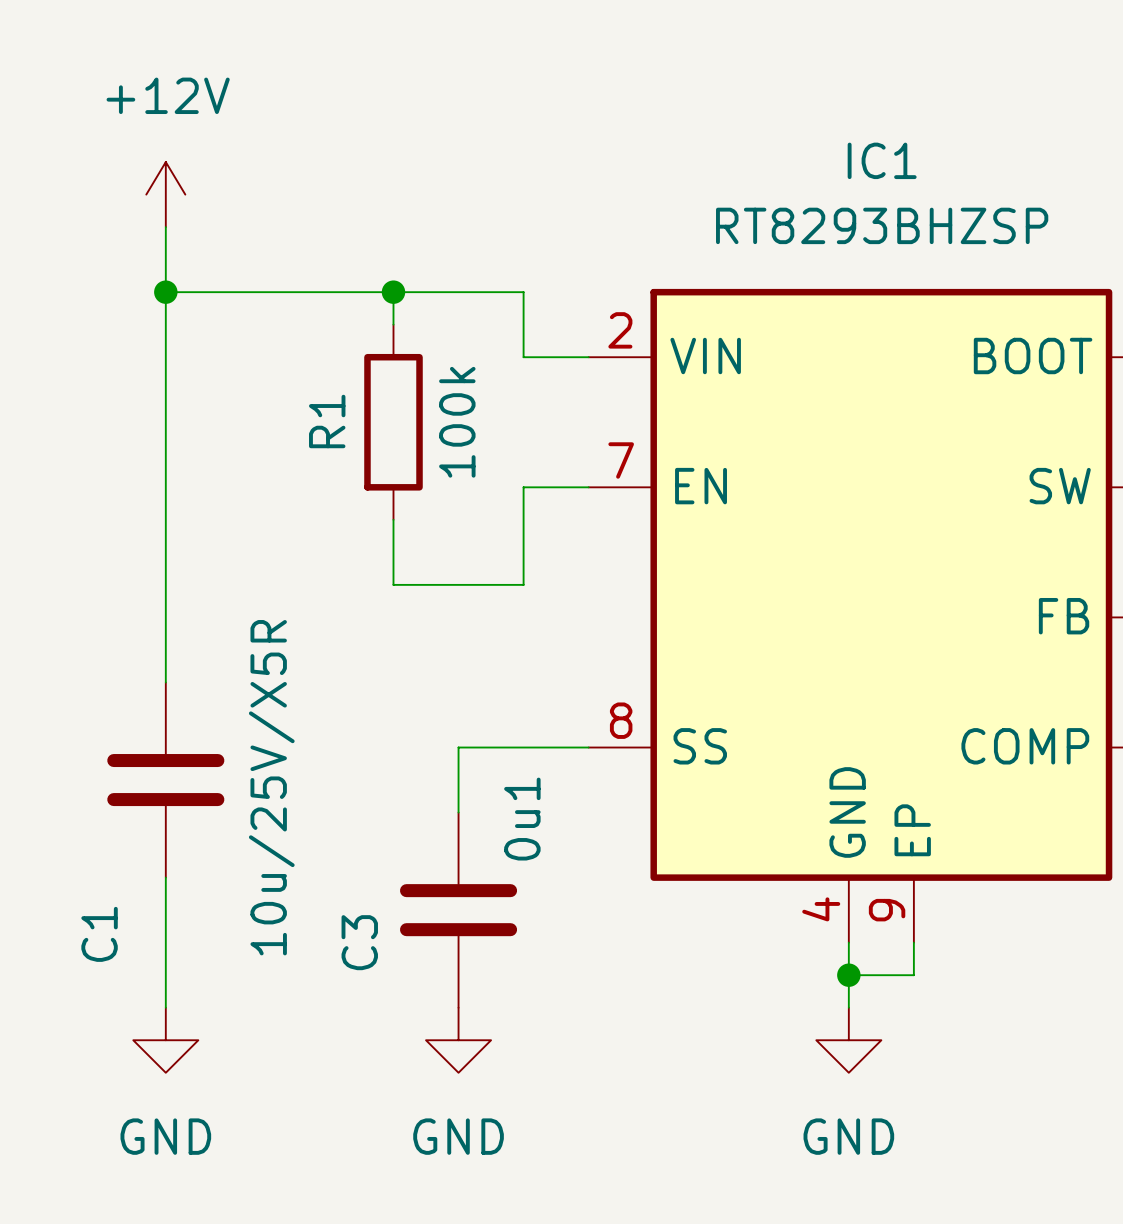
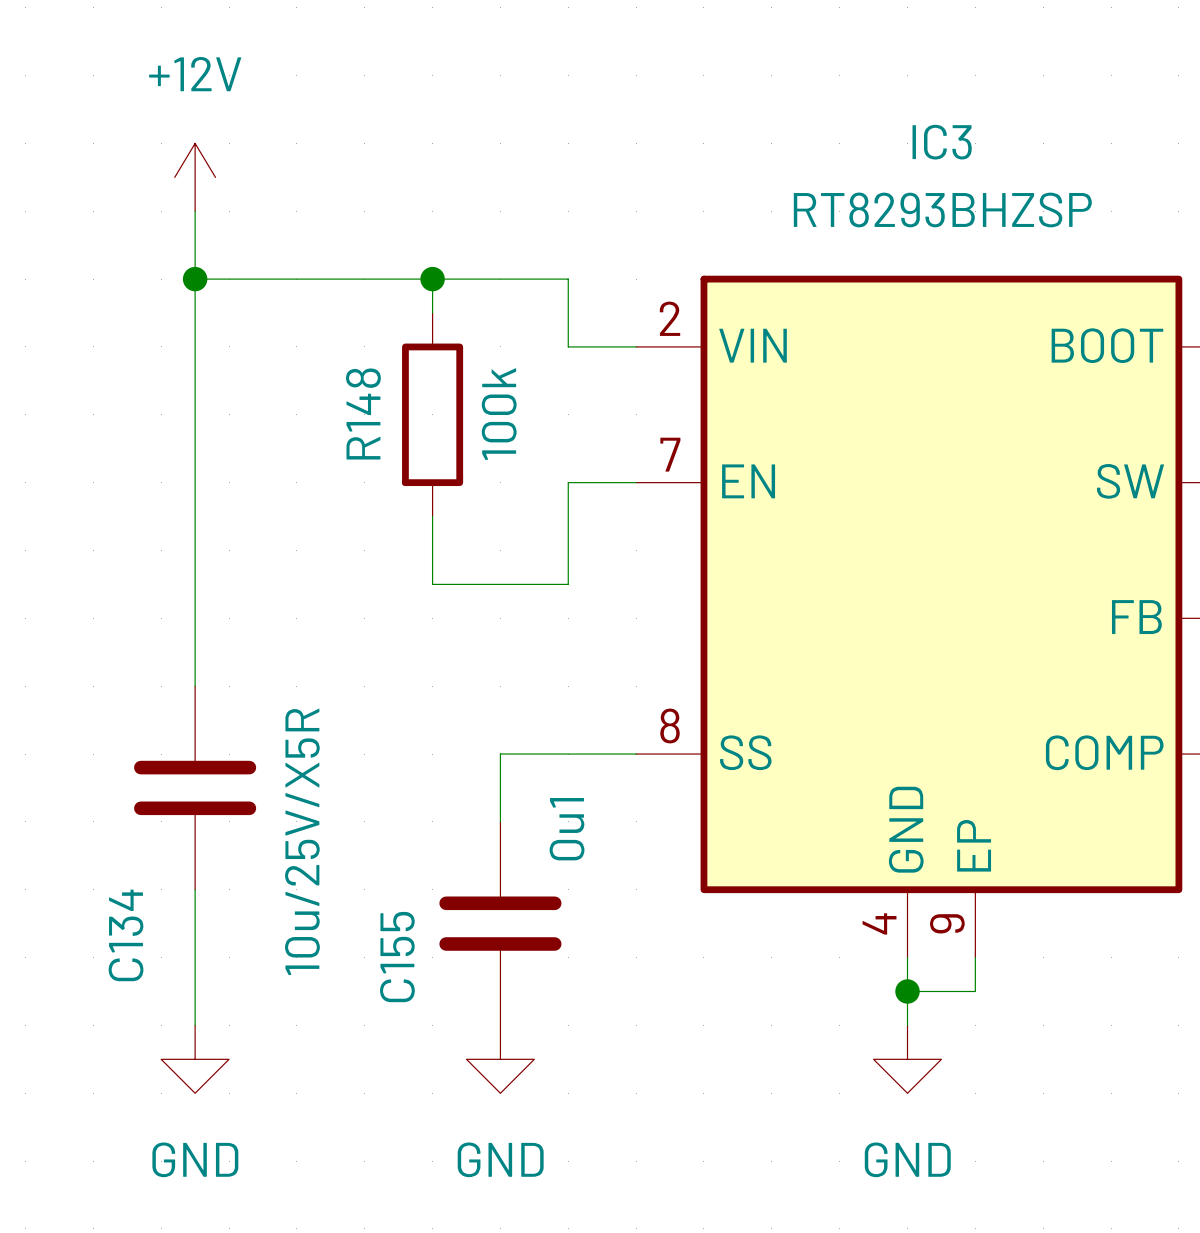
IC1 name: IC1 (882, 160) -> IC3 (942, 142)
R1 name: R1 (327, 421) -> R148 (363, 413)
C1 name: C1 (99, 934) -> C134 (126, 935)
C3 name: C3 (359, 942) -> C155 (397, 957)

